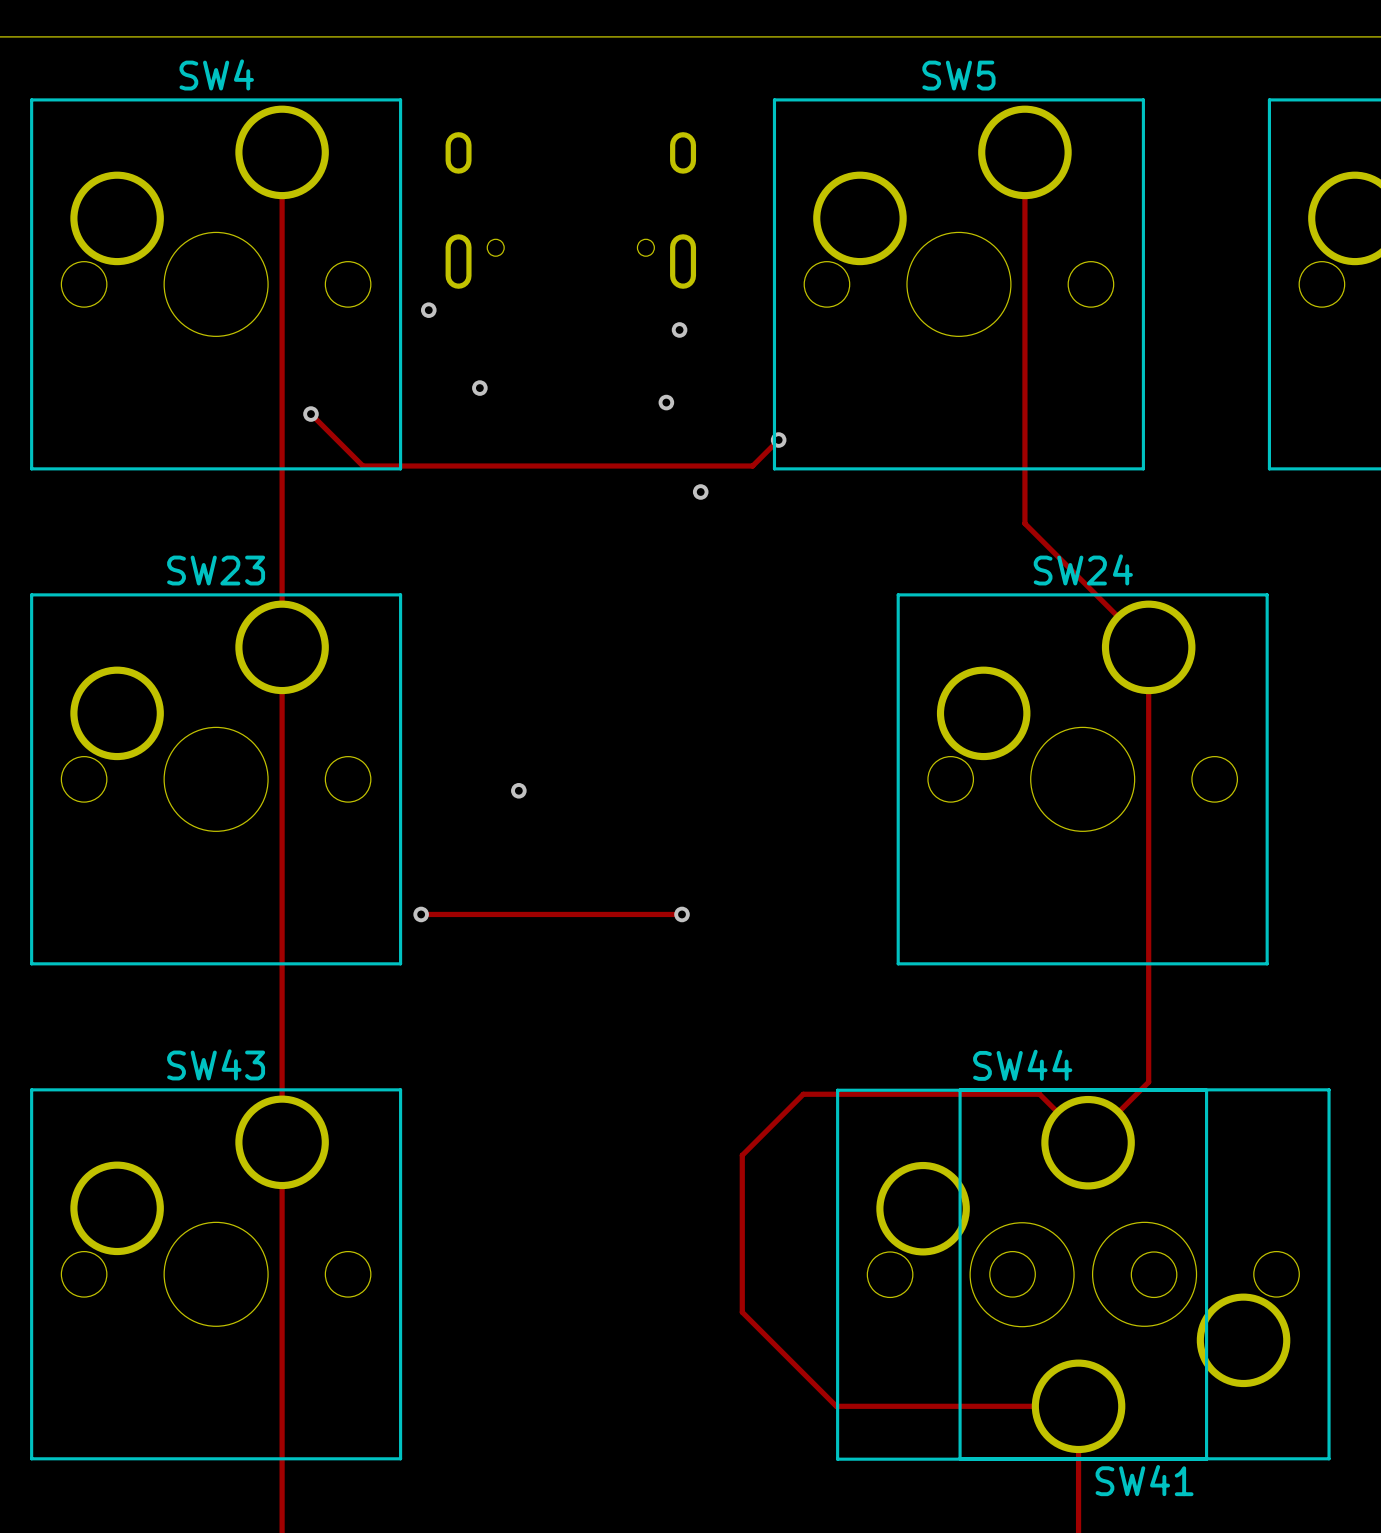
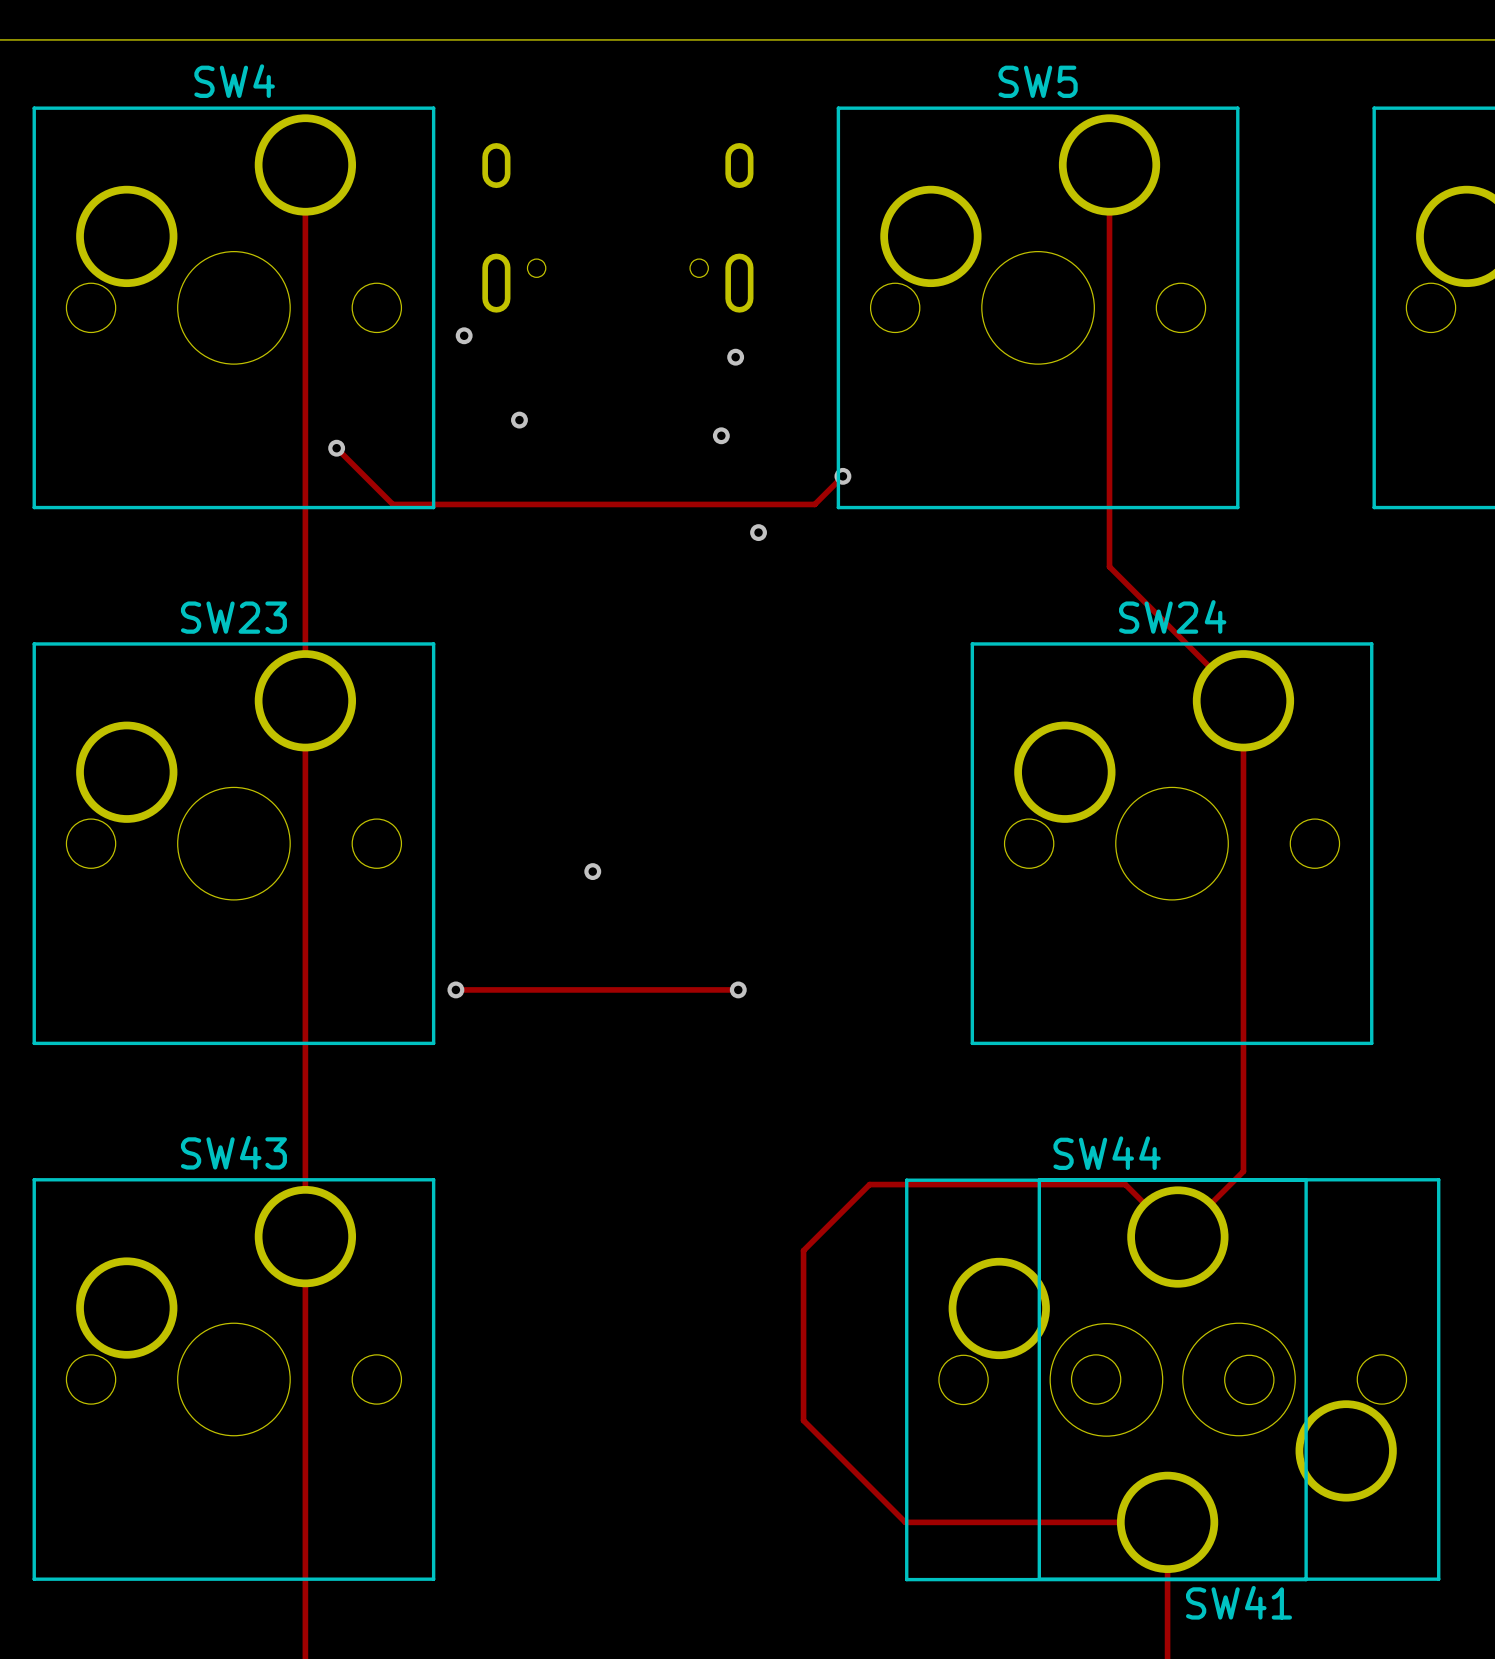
via position: (518, 790) -> (592, 871)

